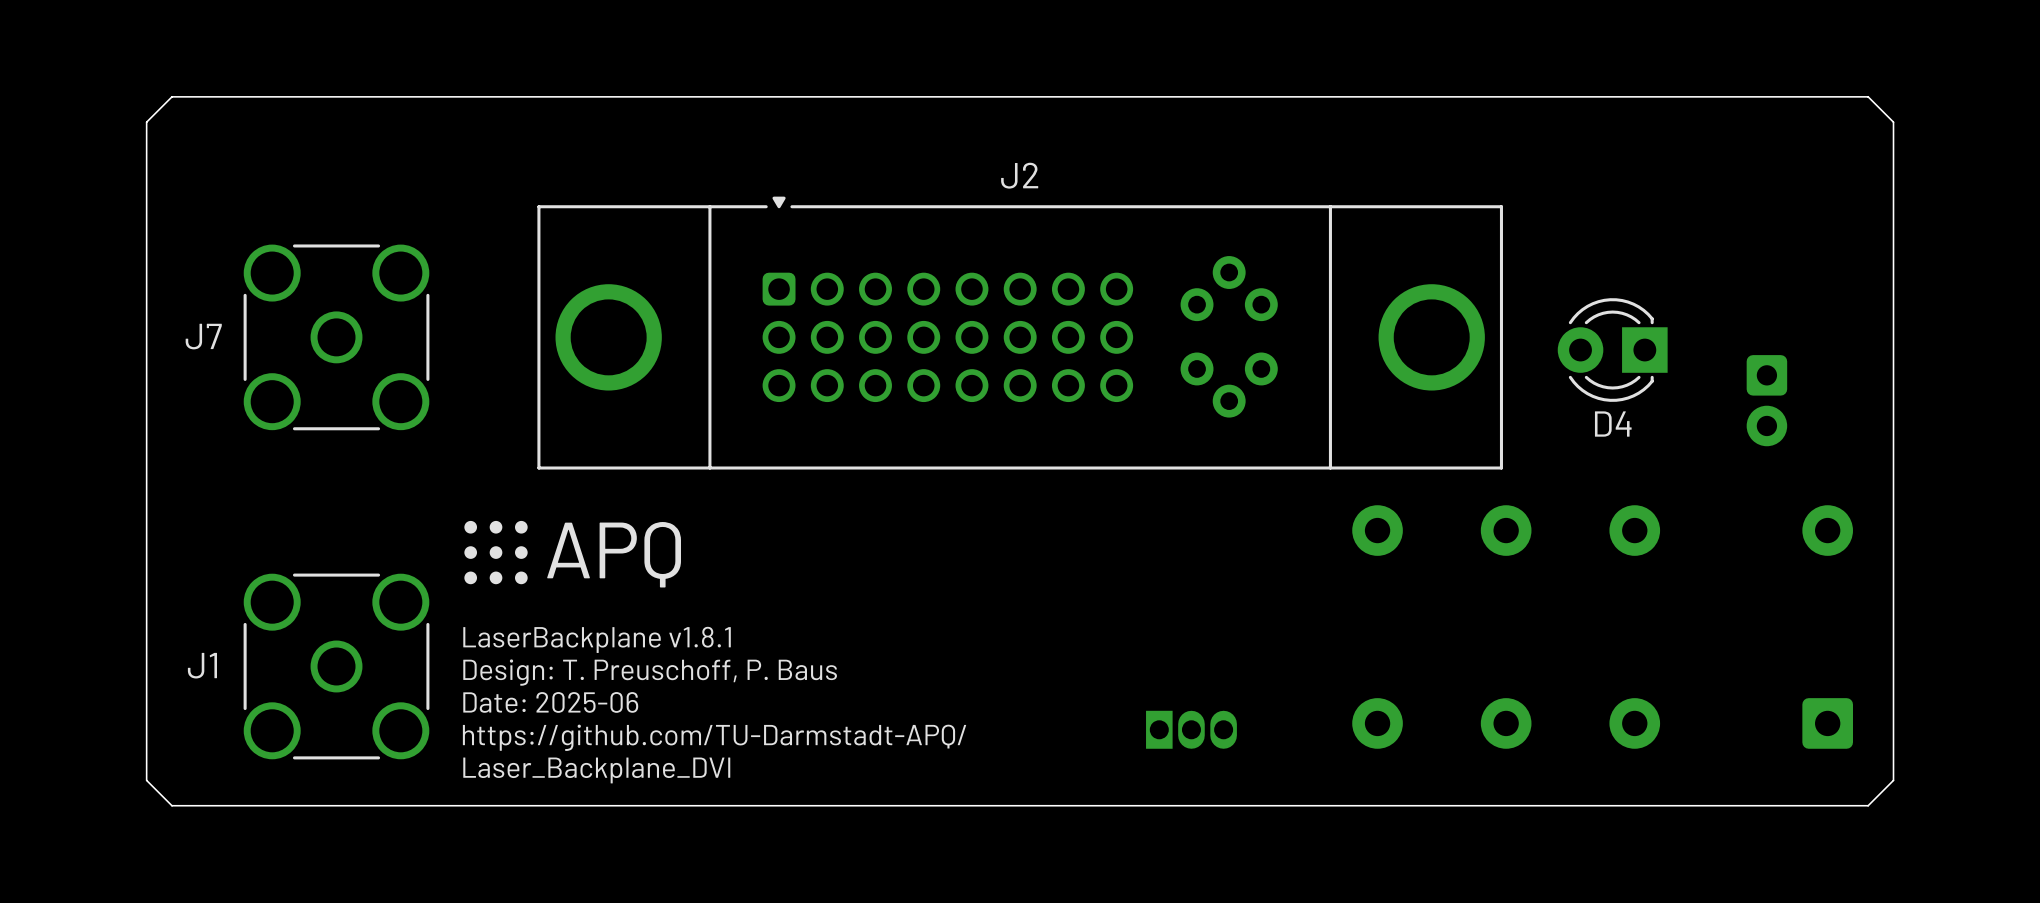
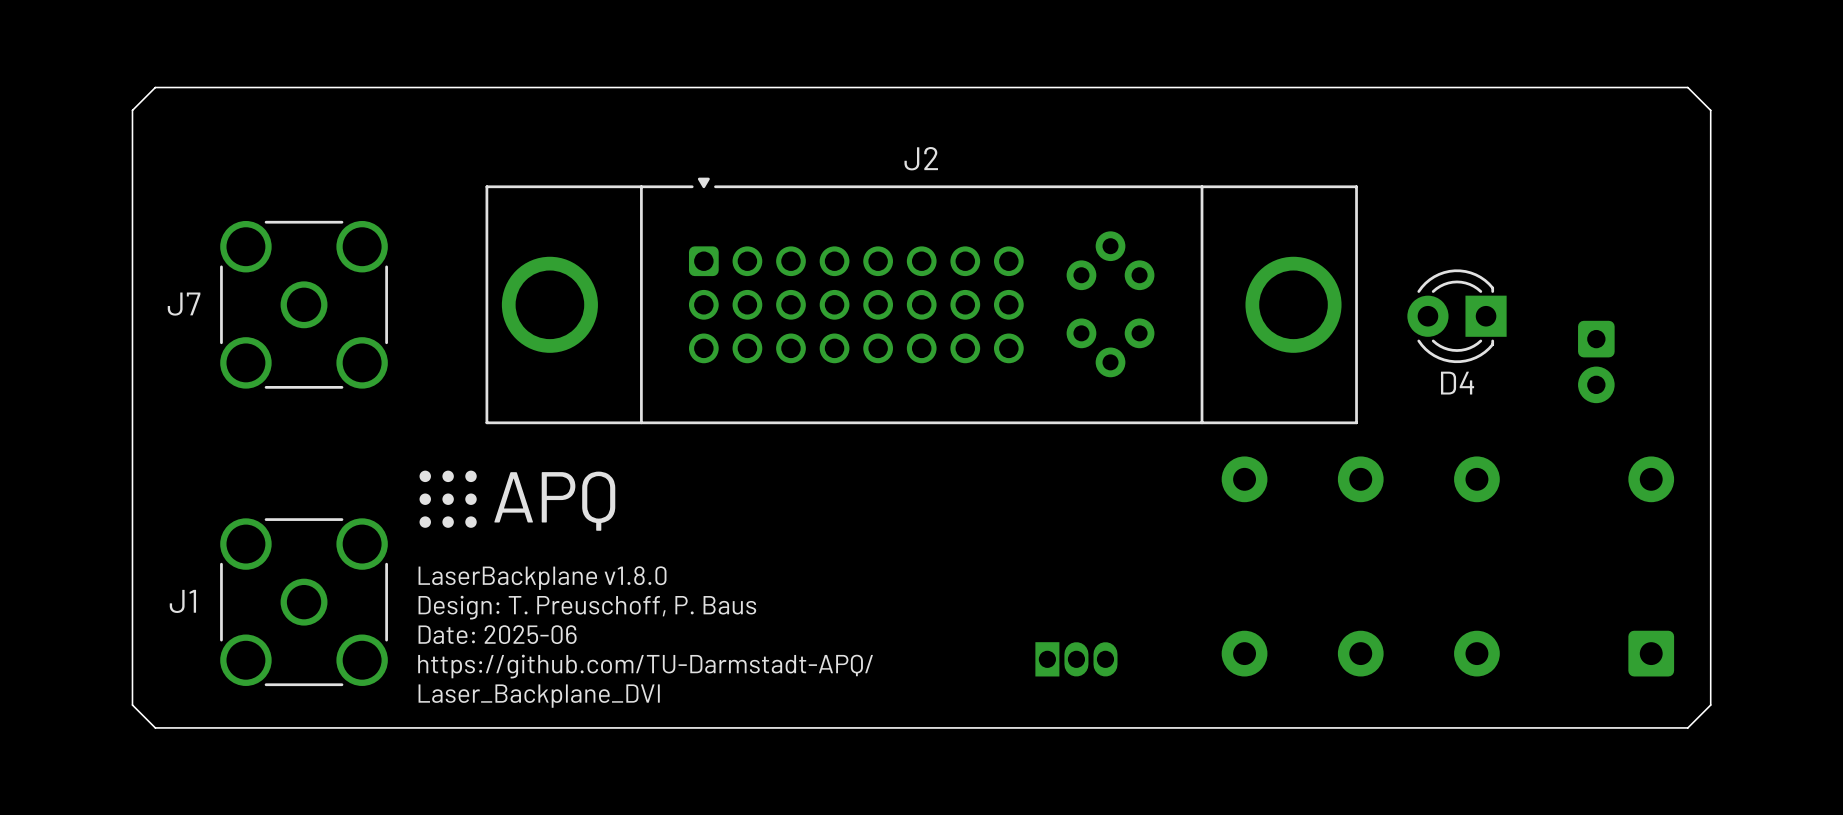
text: LaserBackplane v1.8.1 (597, 639) -> LaserBackplane v1.8.0 (542, 578)

